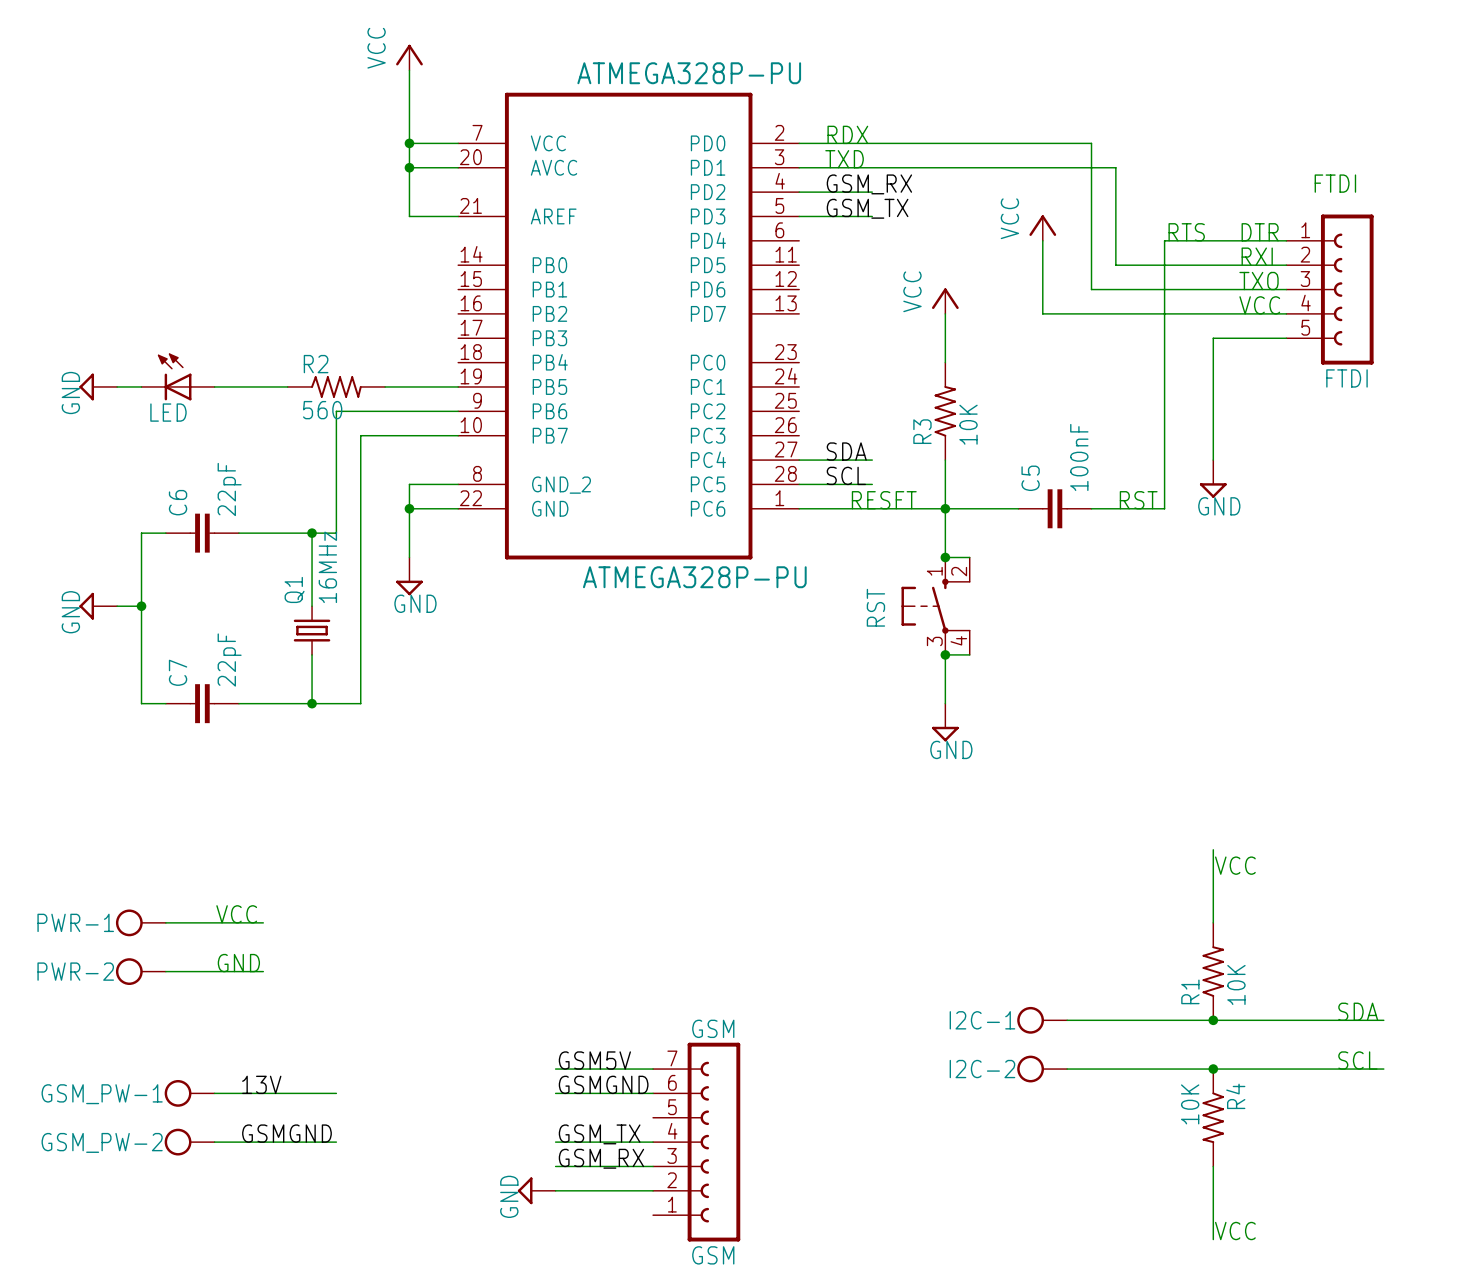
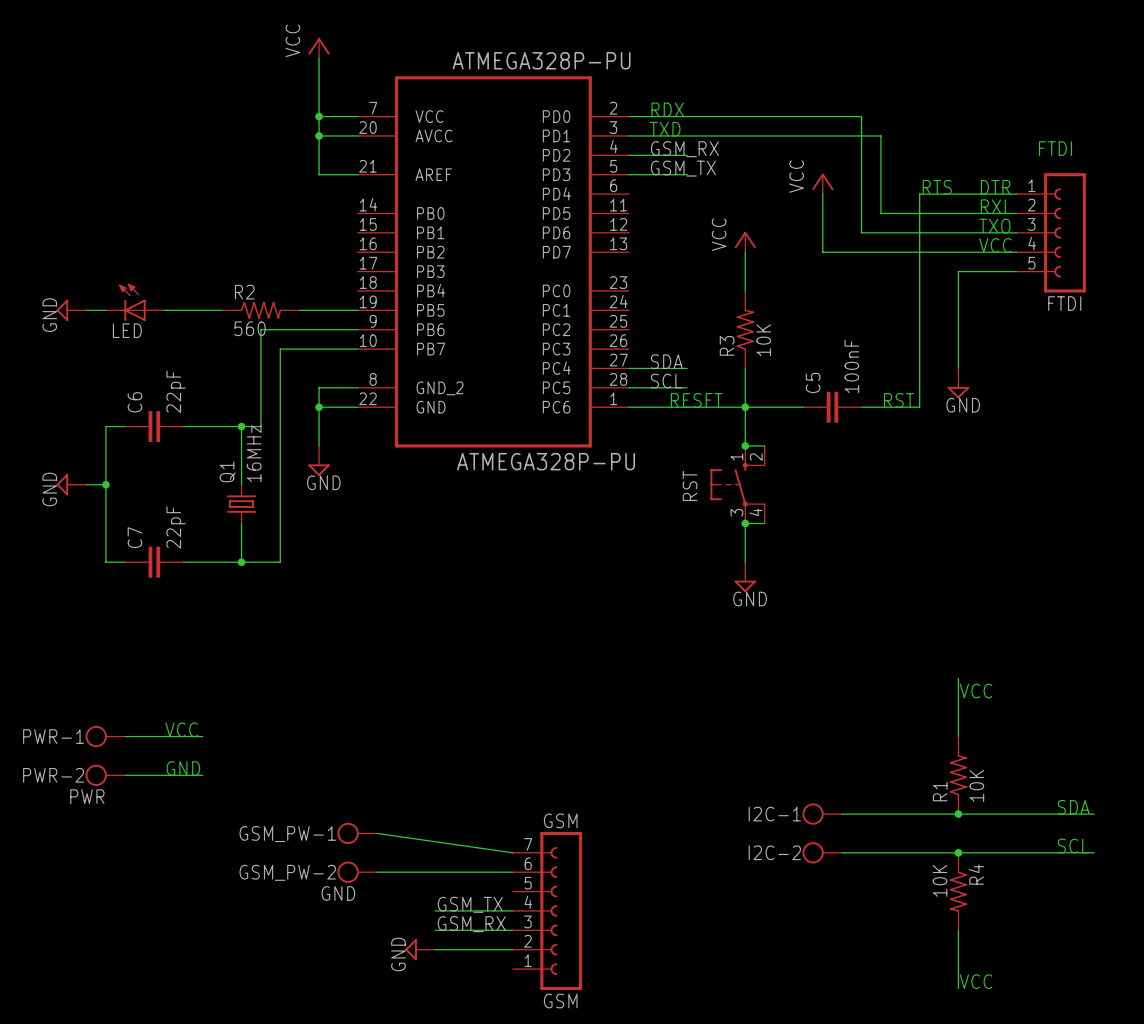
PWR-2 value: none -> PWR (87, 796)
label: GSM5V (594, 1060) -> none
wire: (555, 1069) (653, 1069) -> (377, 833) (512, 852)
label: 13V (261, 1084) -> none
label: GSMGND (603, 1084) -> none
GSM_PW-1 position: (189, 1093) -> (357, 833)
wire: (214, 1093) (336, 1093) -> none
wire: none -> (377, 872) (435, 872)
GSM_PW-2 value: none -> GND (338, 893)
label: GSMGND (286, 1133) -> none
GSM_PW-2 position: (189, 1142) -> (357, 872)
wire: (214, 1142) (336, 1142) -> none

